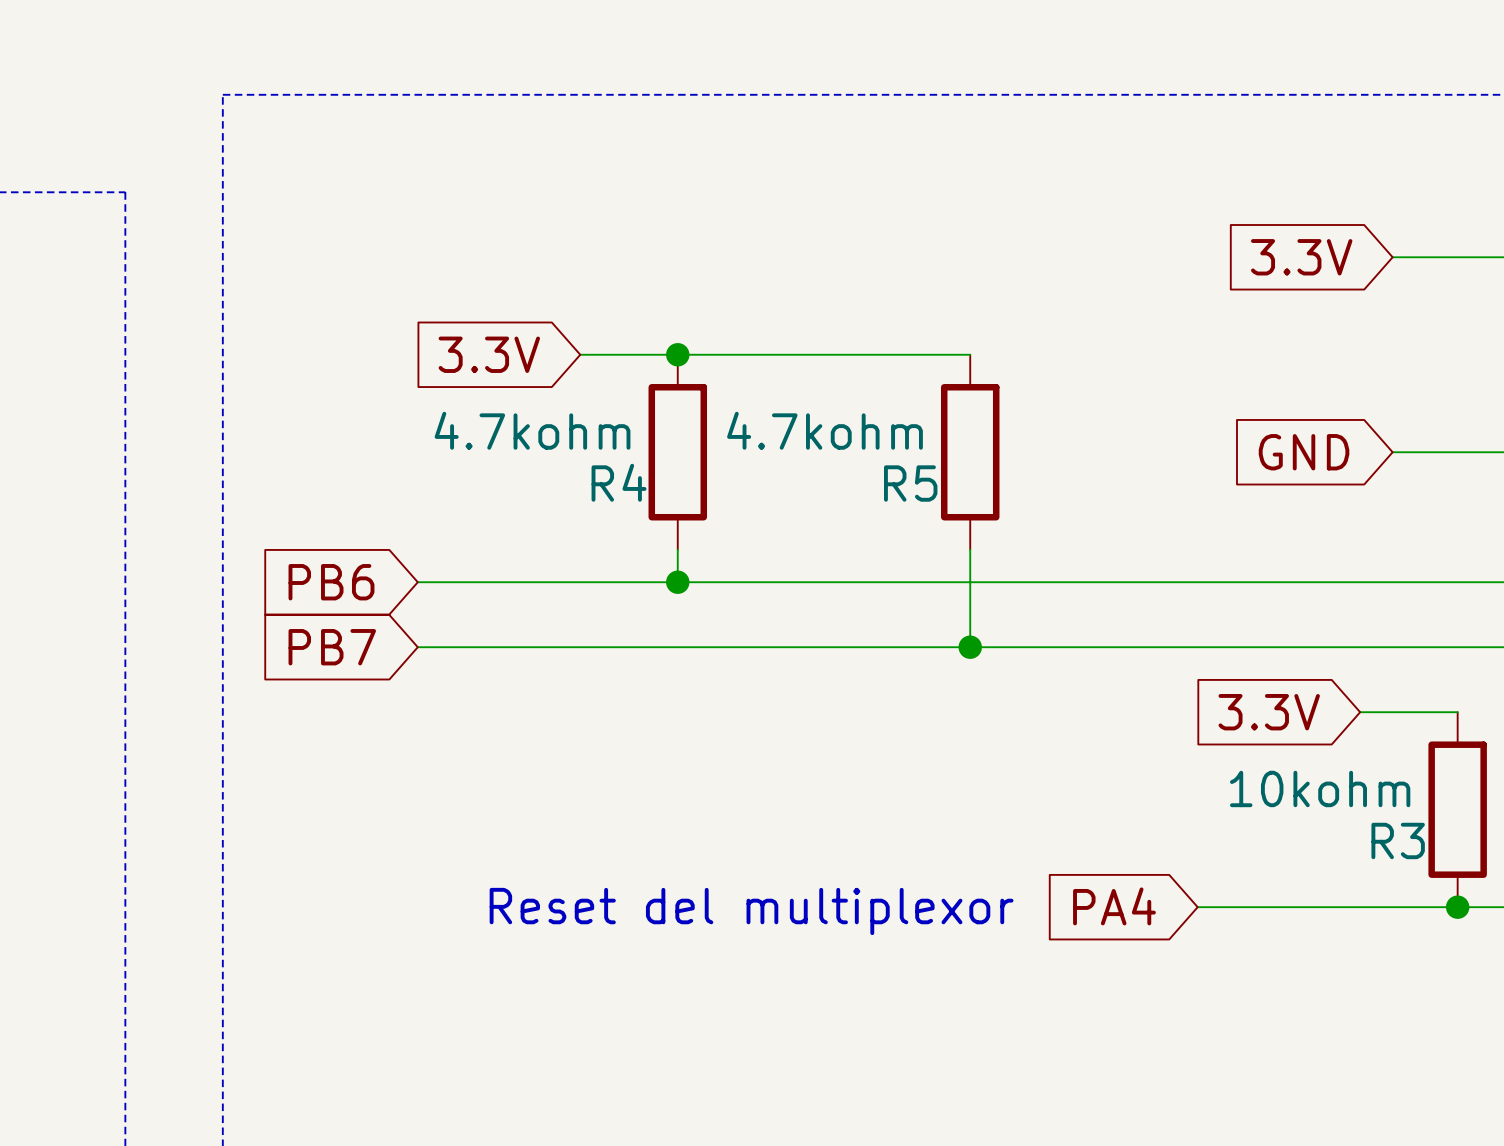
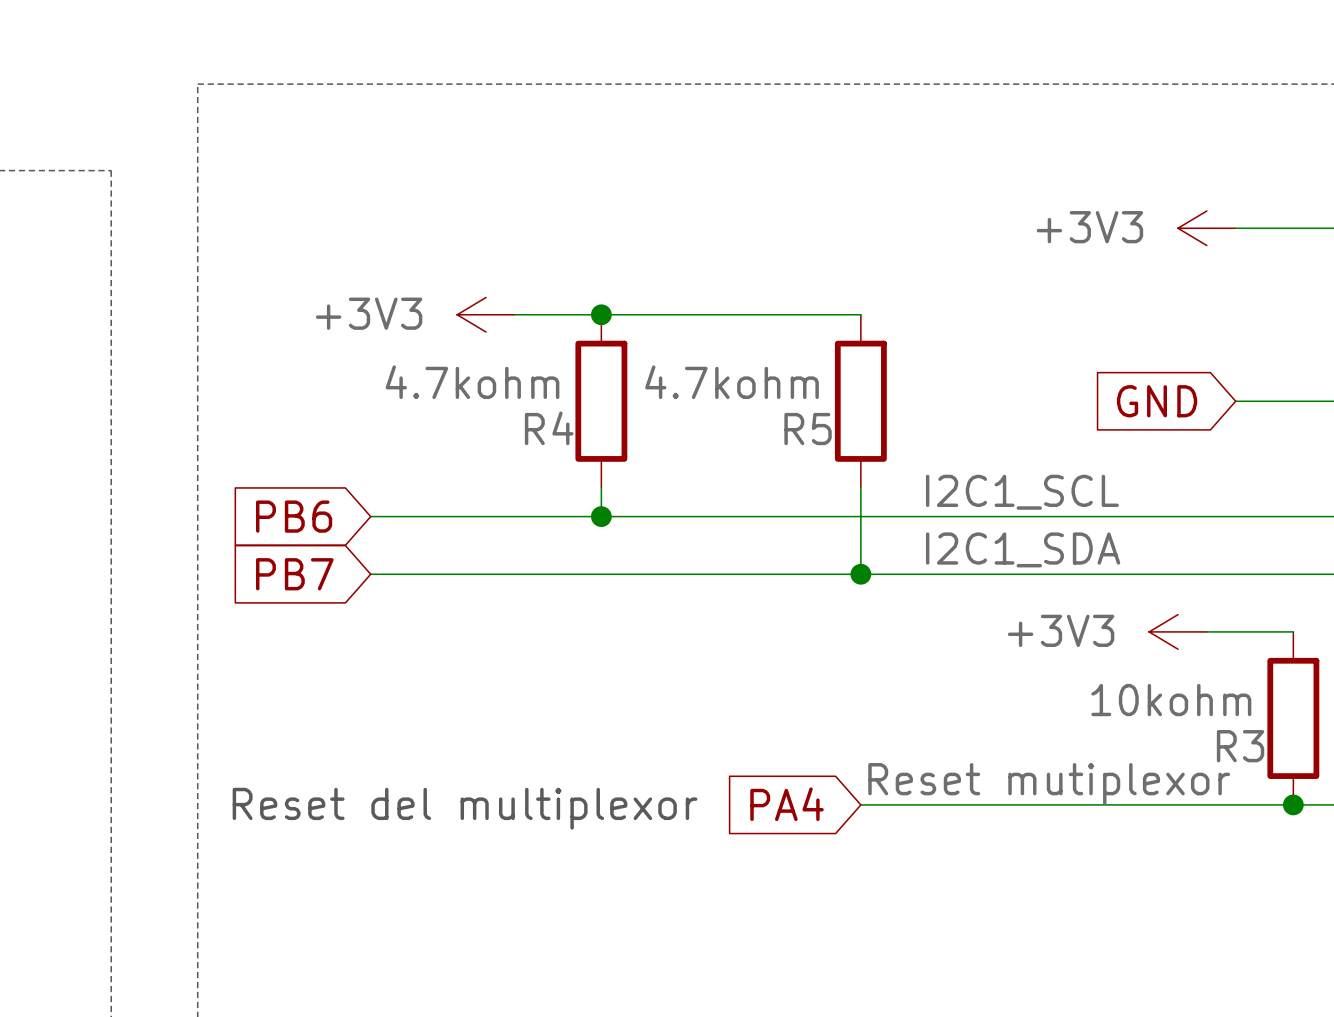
global label: 3.3V (1301, 257) -> none
power symbol: none -> +3V3 (1206, 228)
global label: 3.3V (489, 354) -> none
power symbol: none -> +3V3 (486, 314)
label: none -> I2C1_SCL (1022, 492)
label: none -> I2C1_SDA (1023, 549)
global label: 3.3V (1269, 712) -> none
power symbol: none -> +3V3 (1178, 631)
label: none -> Reset mutiplexor (1049, 783)
global label position: PA4 (1114, 906) -> PA4 (787, 804)
wire: none -> (860, 804) (1062, 804)
text position: Reset del multiplexor (751, 911) -> Reset del multiplexor (465, 808)

